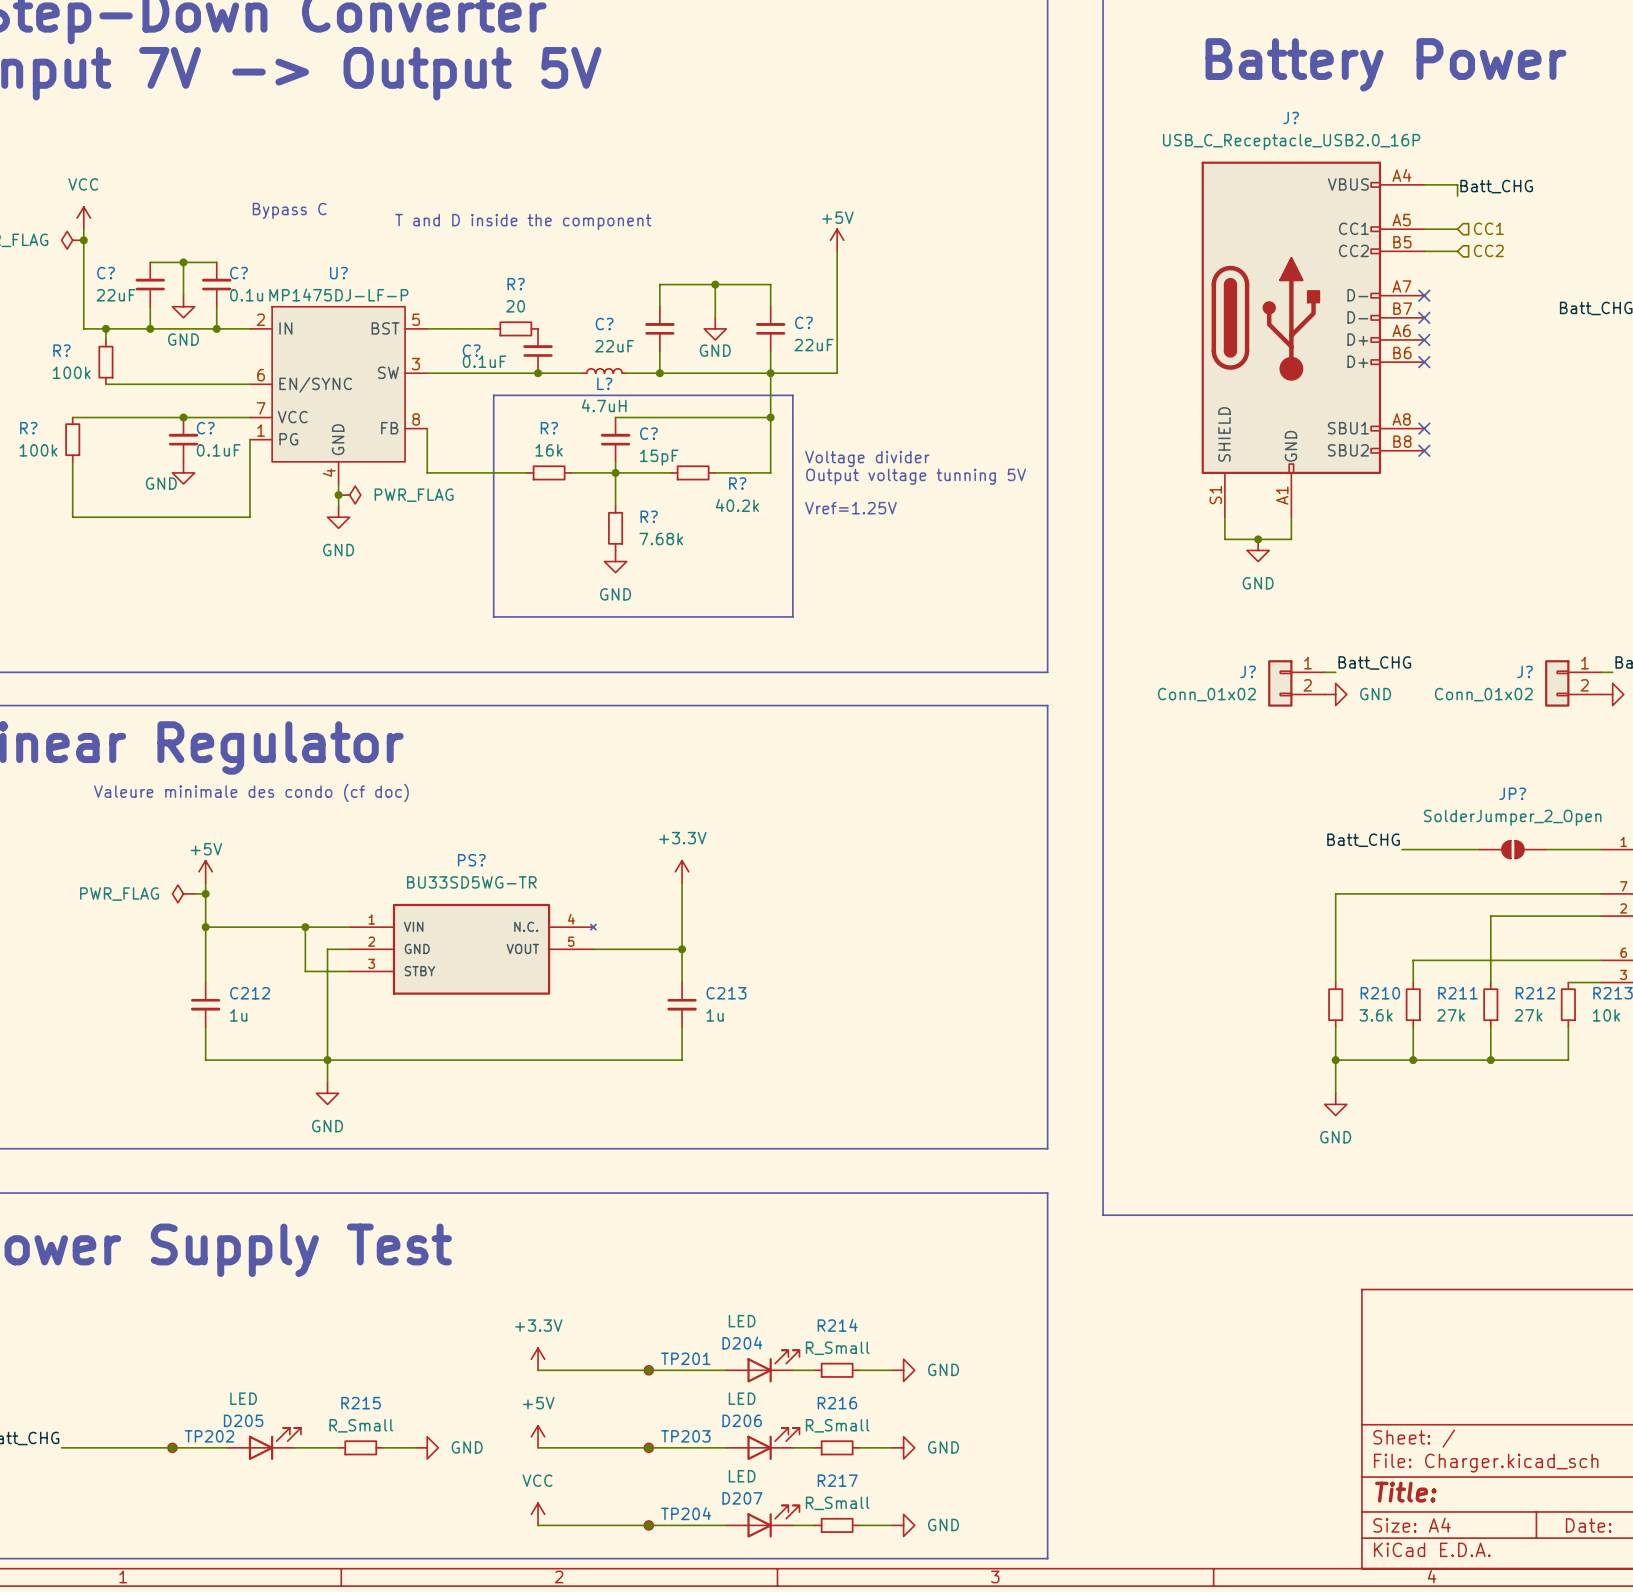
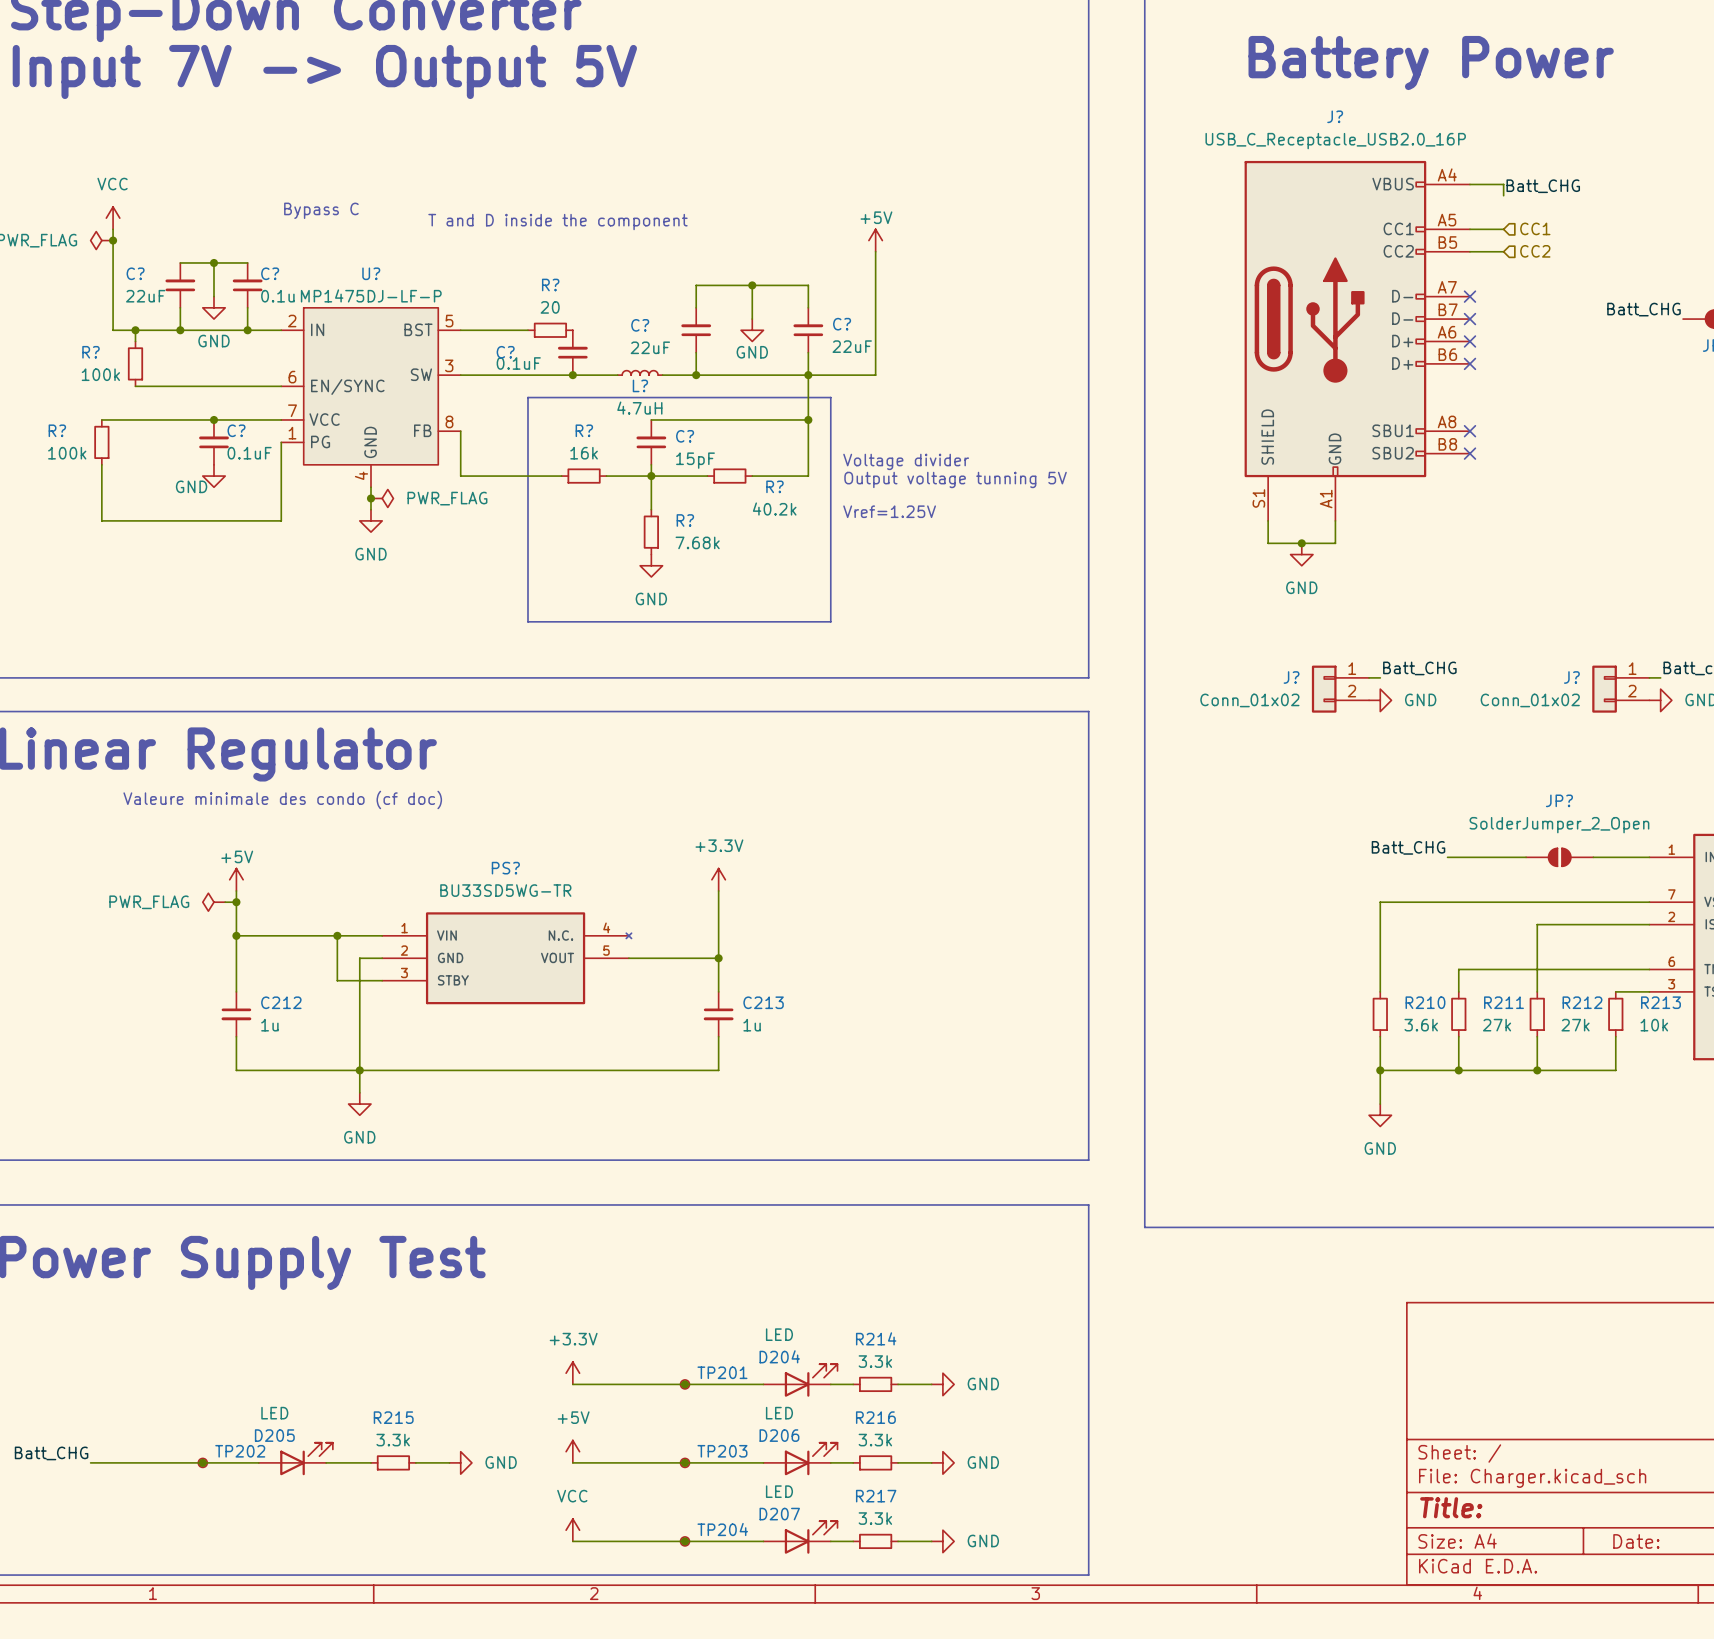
R214 value: R_Small (837, 1348) -> 3.3k (875, 1361)
R215 value: R_Small (361, 1425) -> 3.3k (393, 1440)
R216 value: R_Small (837, 1425) -> 3.3k (875, 1440)
R217 value: R_Small (837, 1503) -> 3.3k (875, 1518)

